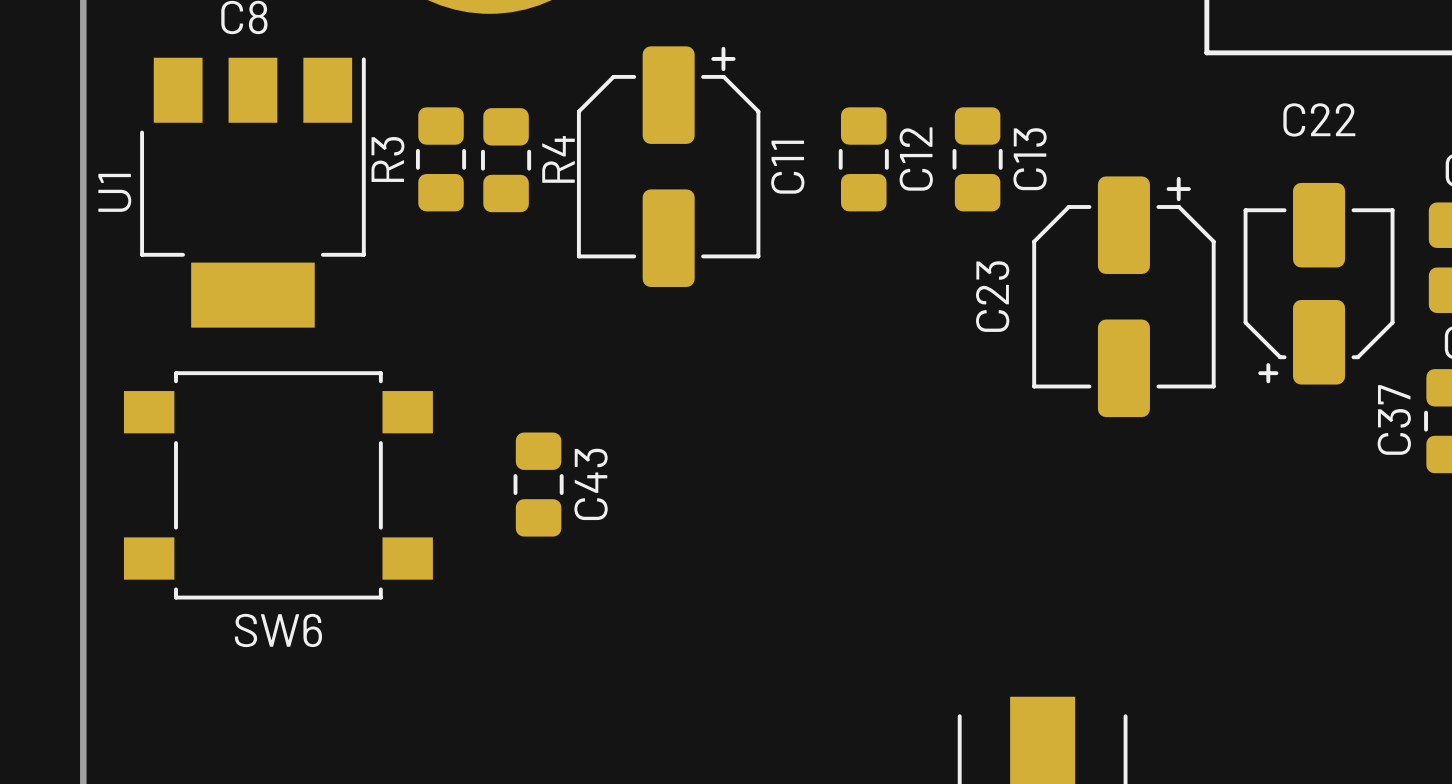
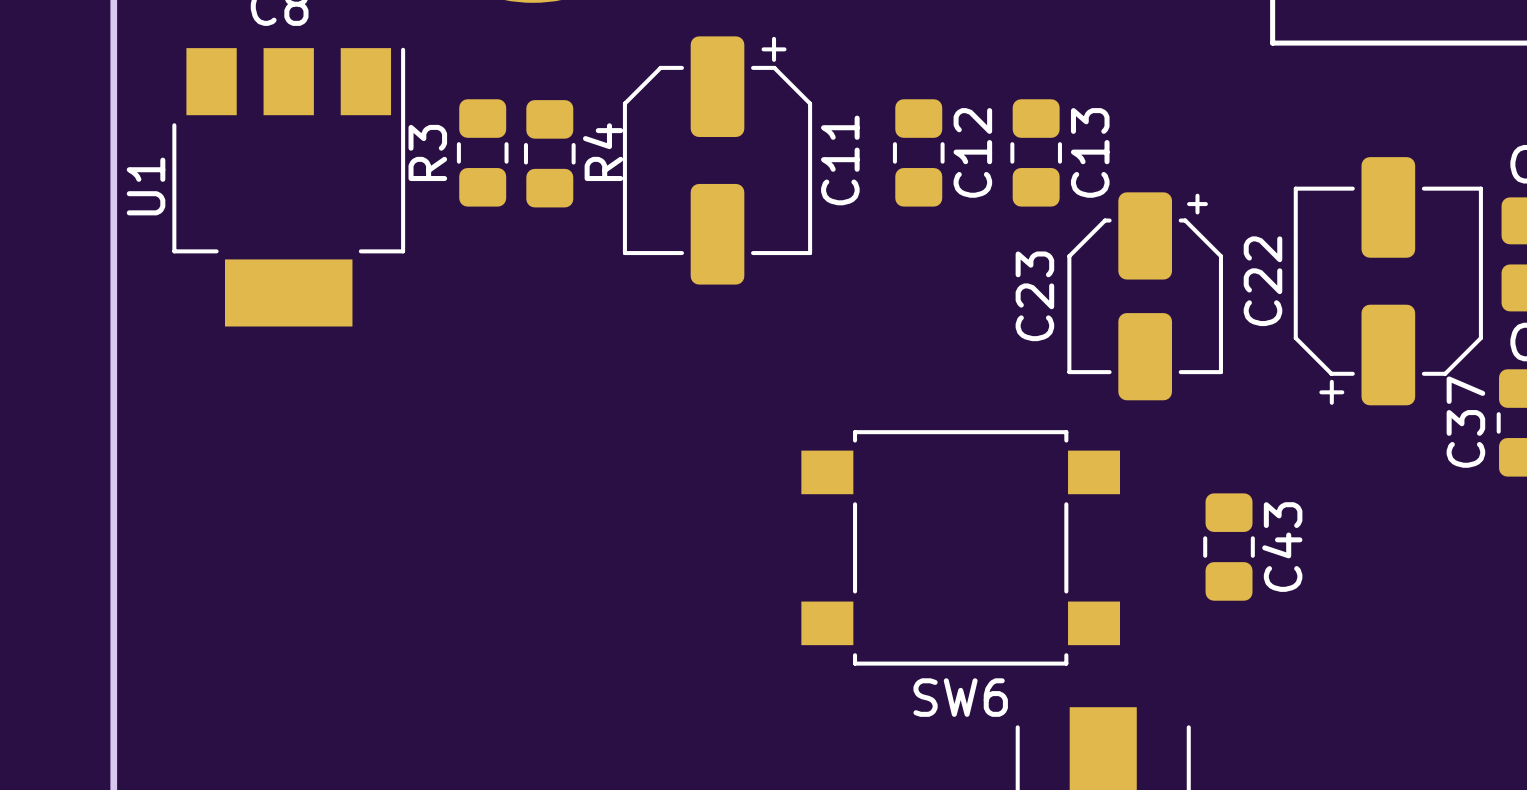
C22 name rotation: 0° (1319, 119) -> 90° counterclockwise (1262, 281)
C22 name position: C22 (1319, 119) -> C22 (1262, 281)
C23 footprint: [1032, 176, 1216, 418] -> [1067, 192, 1223, 401]
C22 footprint: [1243, 182, 1395, 385] -> [1293, 157, 1483, 406]
C43 position: (538, 484) -> (1229, 547)
SW6 position: (278, 485) -> (960, 547)

